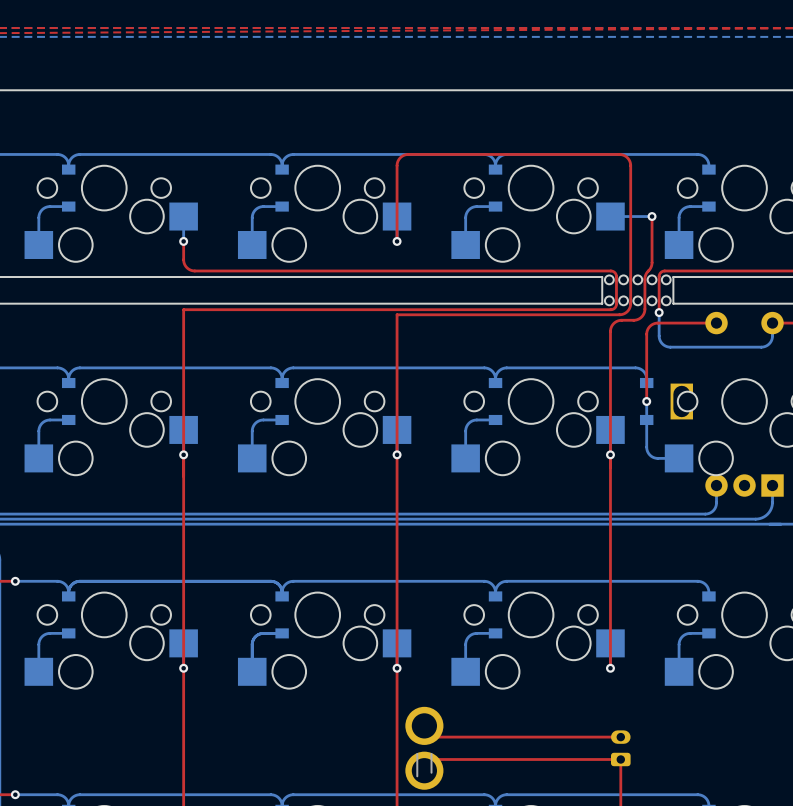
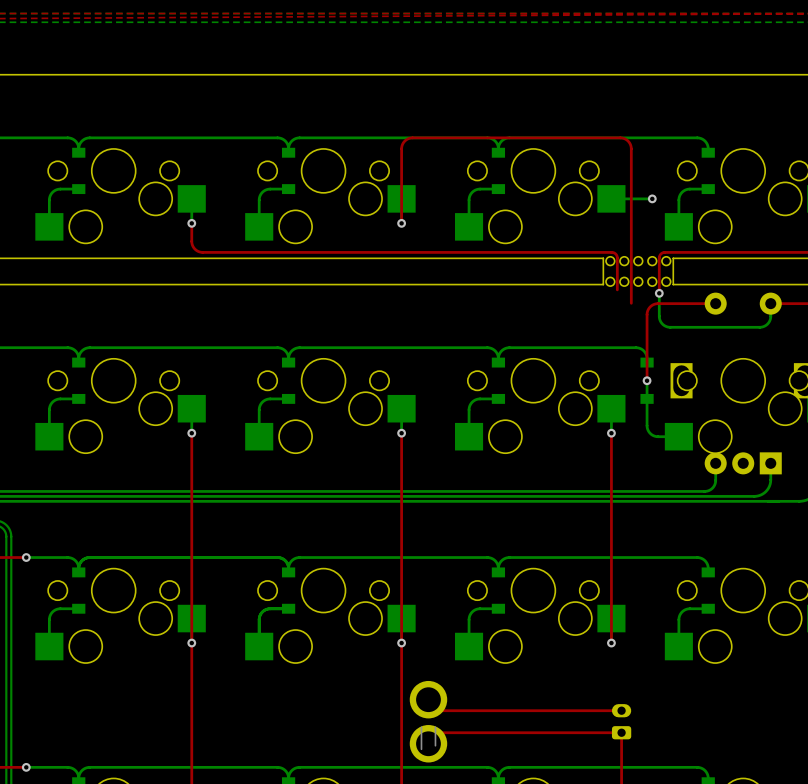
top track: (652, 216) (651, 263) (645, 276) (644, 312) (637, 319) (616, 321) (610, 328) (610, 454) -> none
top track: (630, 303) (627, 311) (619, 314) (397, 314) (397, 454) -> (631, 284) (631, 303)
top track: (616, 304) (614, 308) (610, 309) (183, 309) (183, 454) -> (617, 284) (617, 289)

